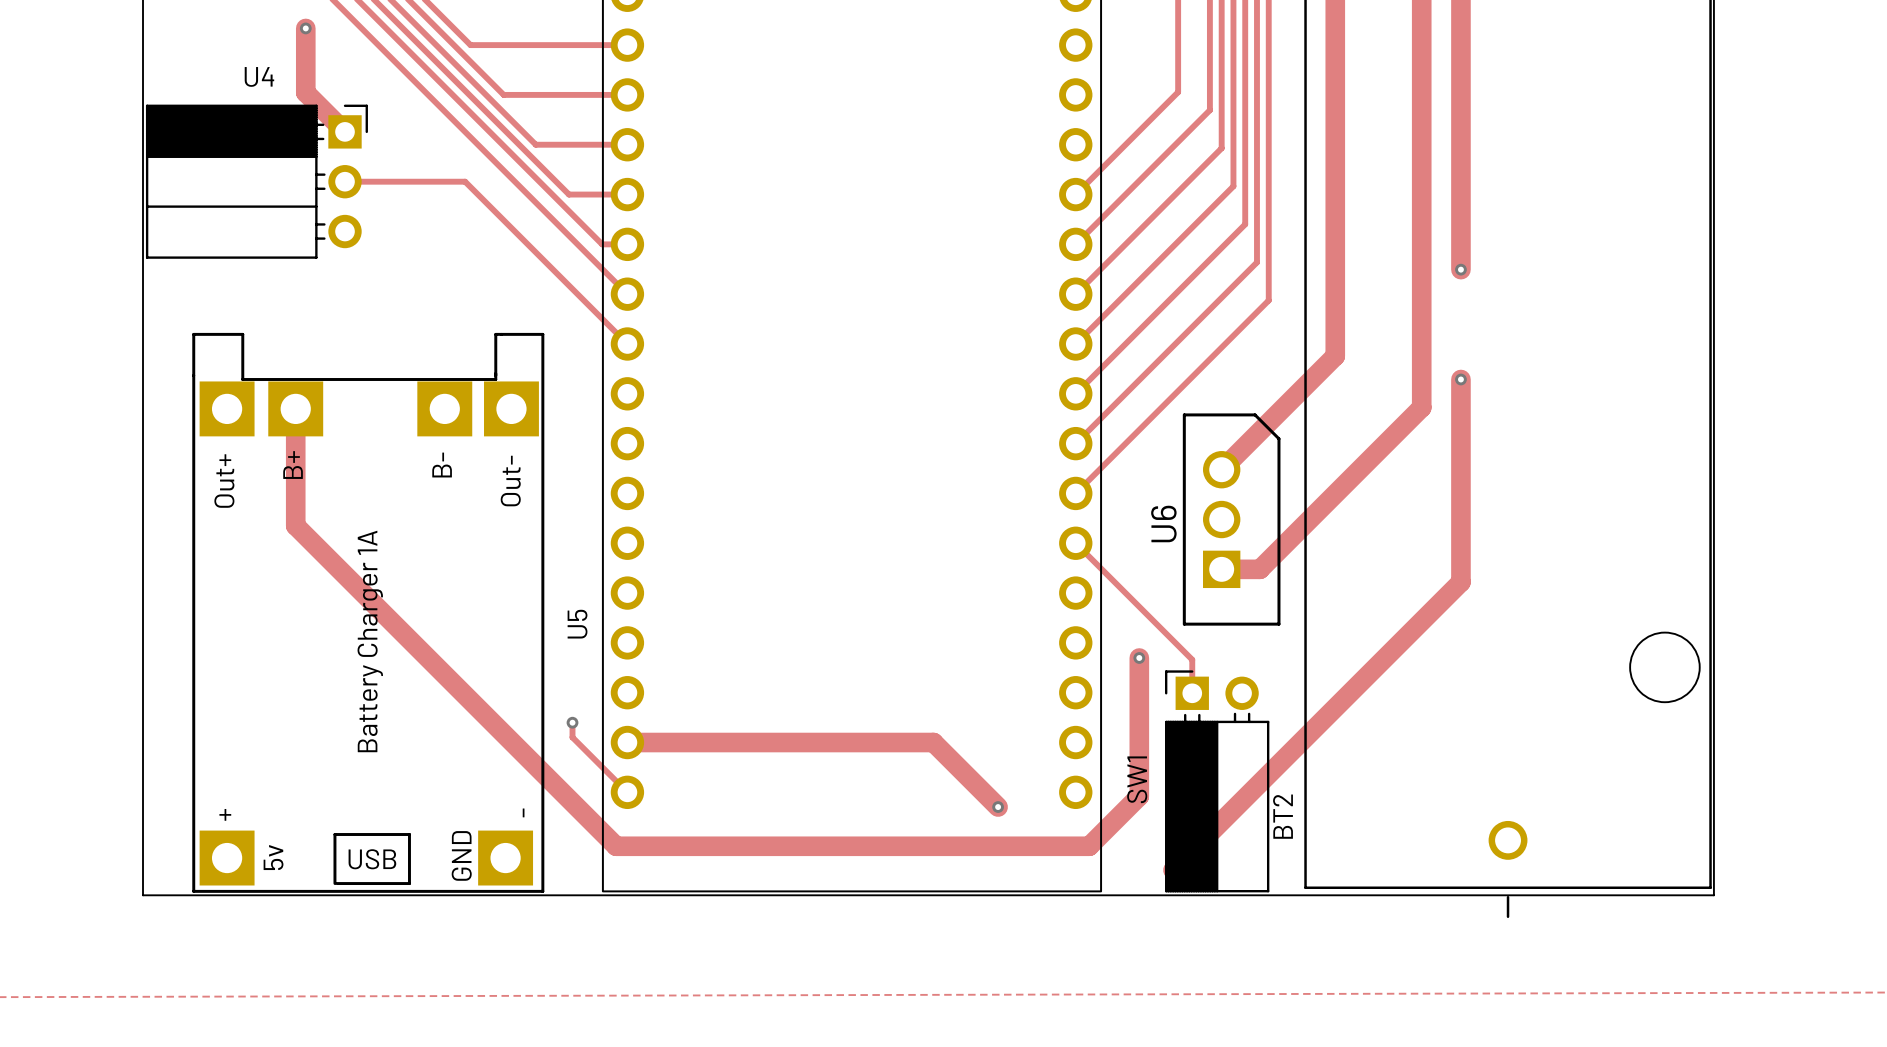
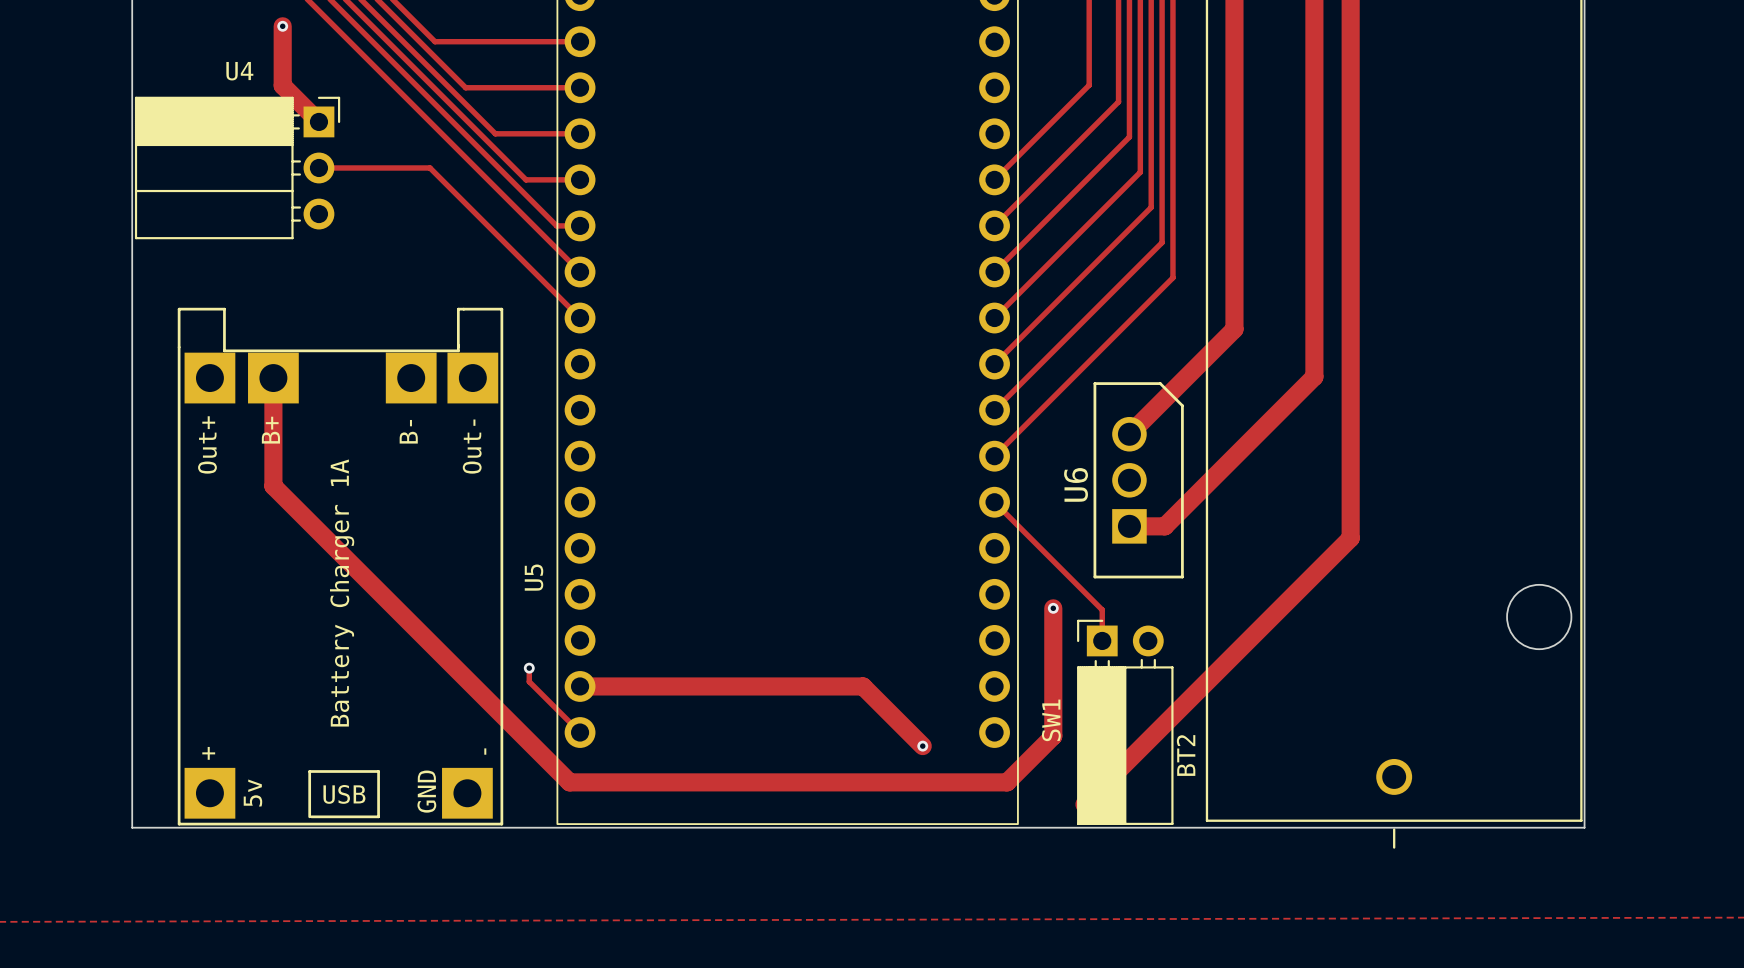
track: none -> (1350, 249) (1350, 350)
via: (1460, 269) -> none
via: (1460, 379) -> none

